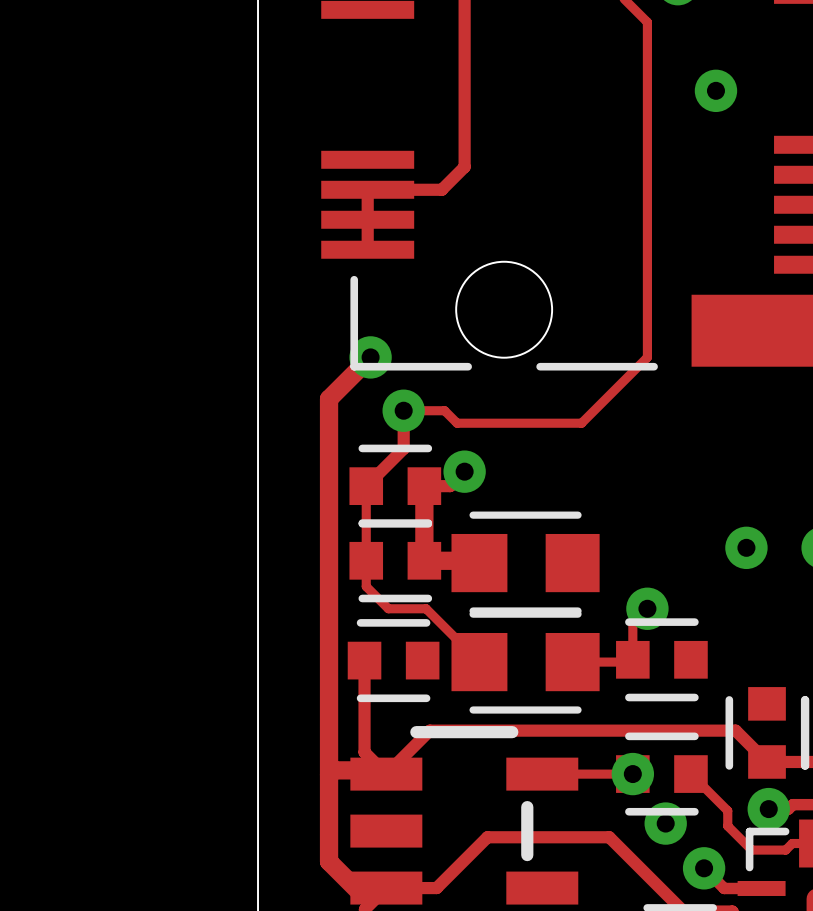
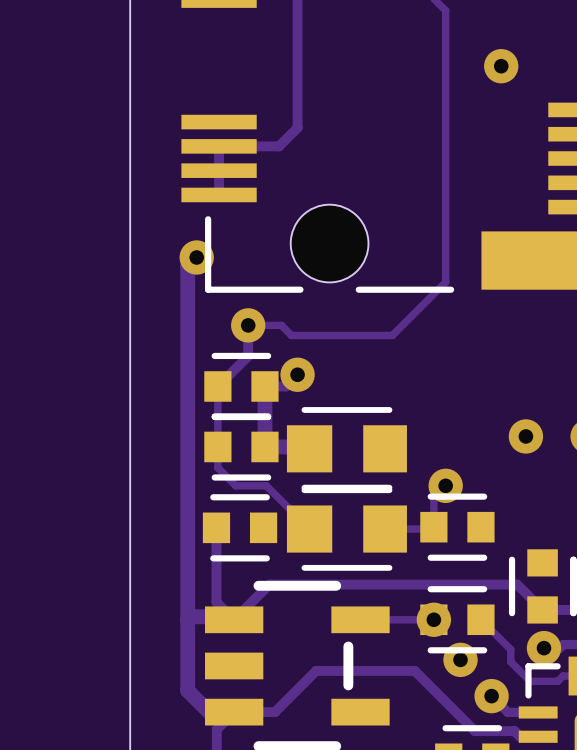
track: (370, 357) (329, 398) -> (196, 257) (187, 266) (187, 315)
via position: (370, 357) -> (196, 257)

